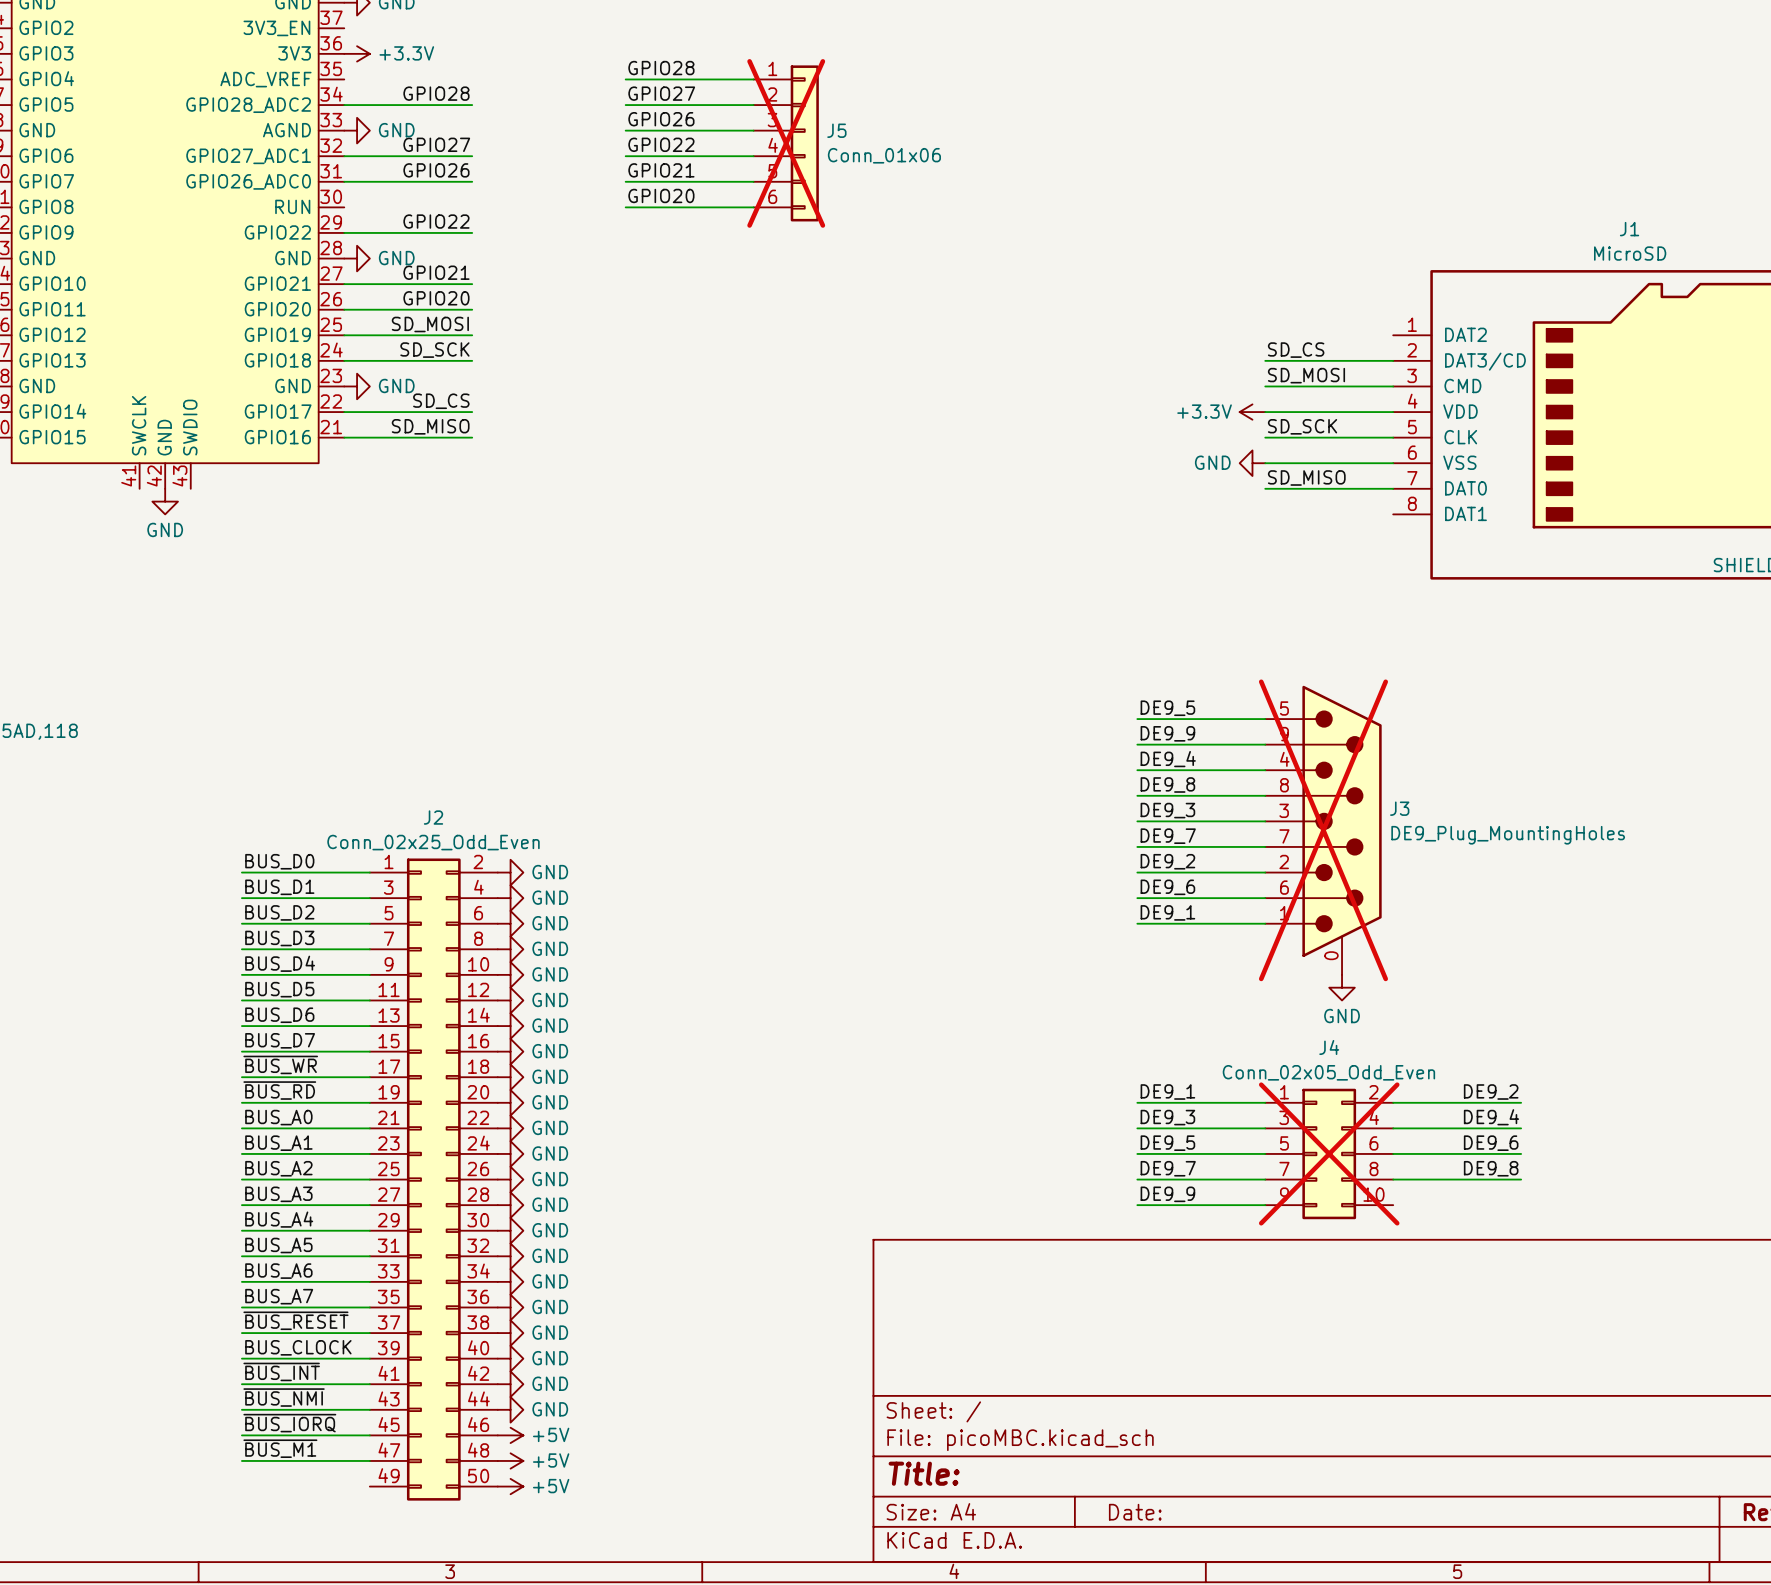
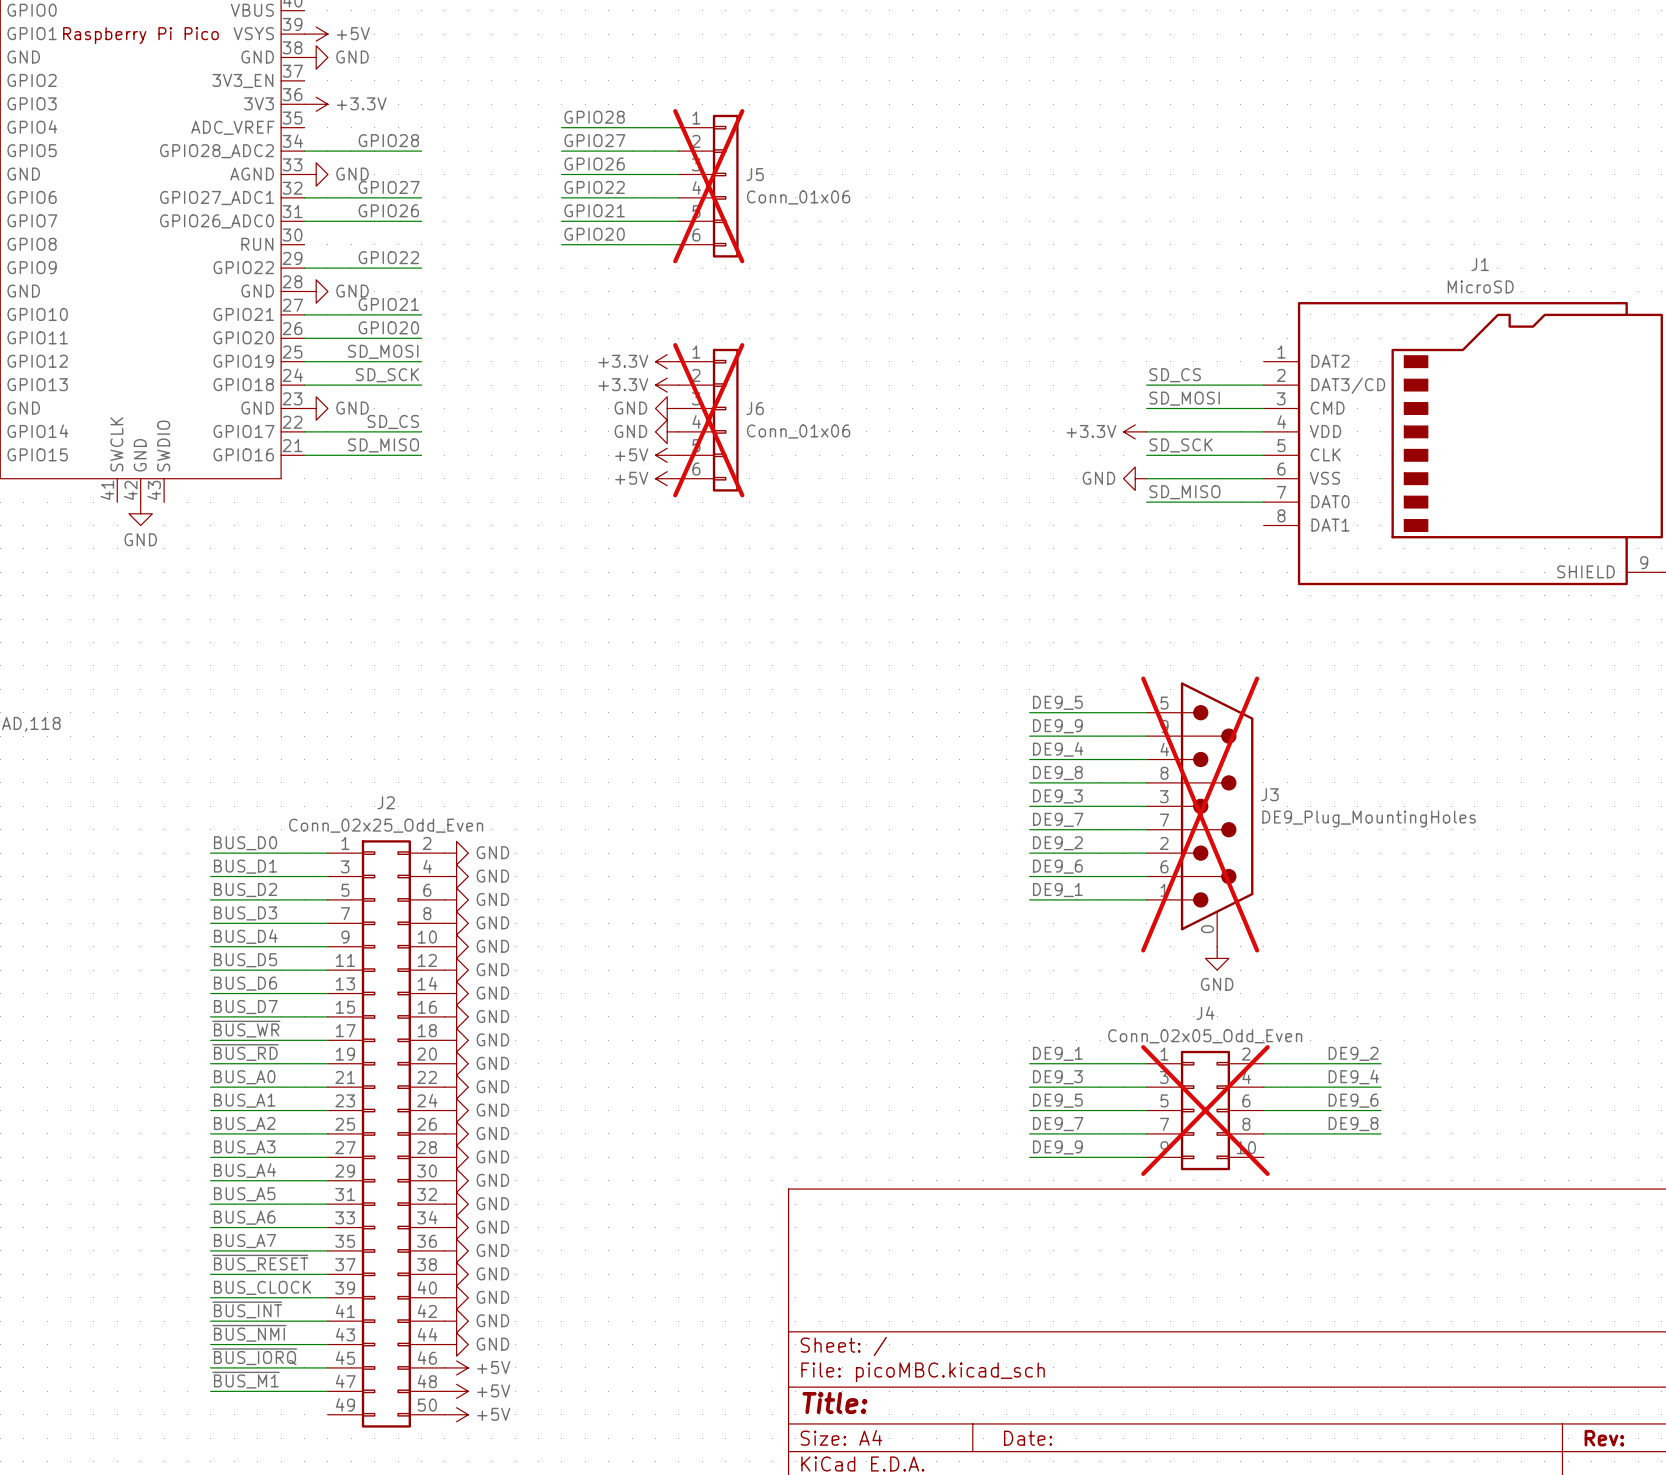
power symbol: none -> +3.3V (667, 361)
power symbol: none -> +3.3V (667, 385)
power symbol: none -> GND (667, 408)
J6: none -> Conn_01x06 (708, 420)
power symbol: none -> GND (667, 431)
power symbol: none -> +5V (667, 455)
power symbol: none -> +5V (667, 478)

